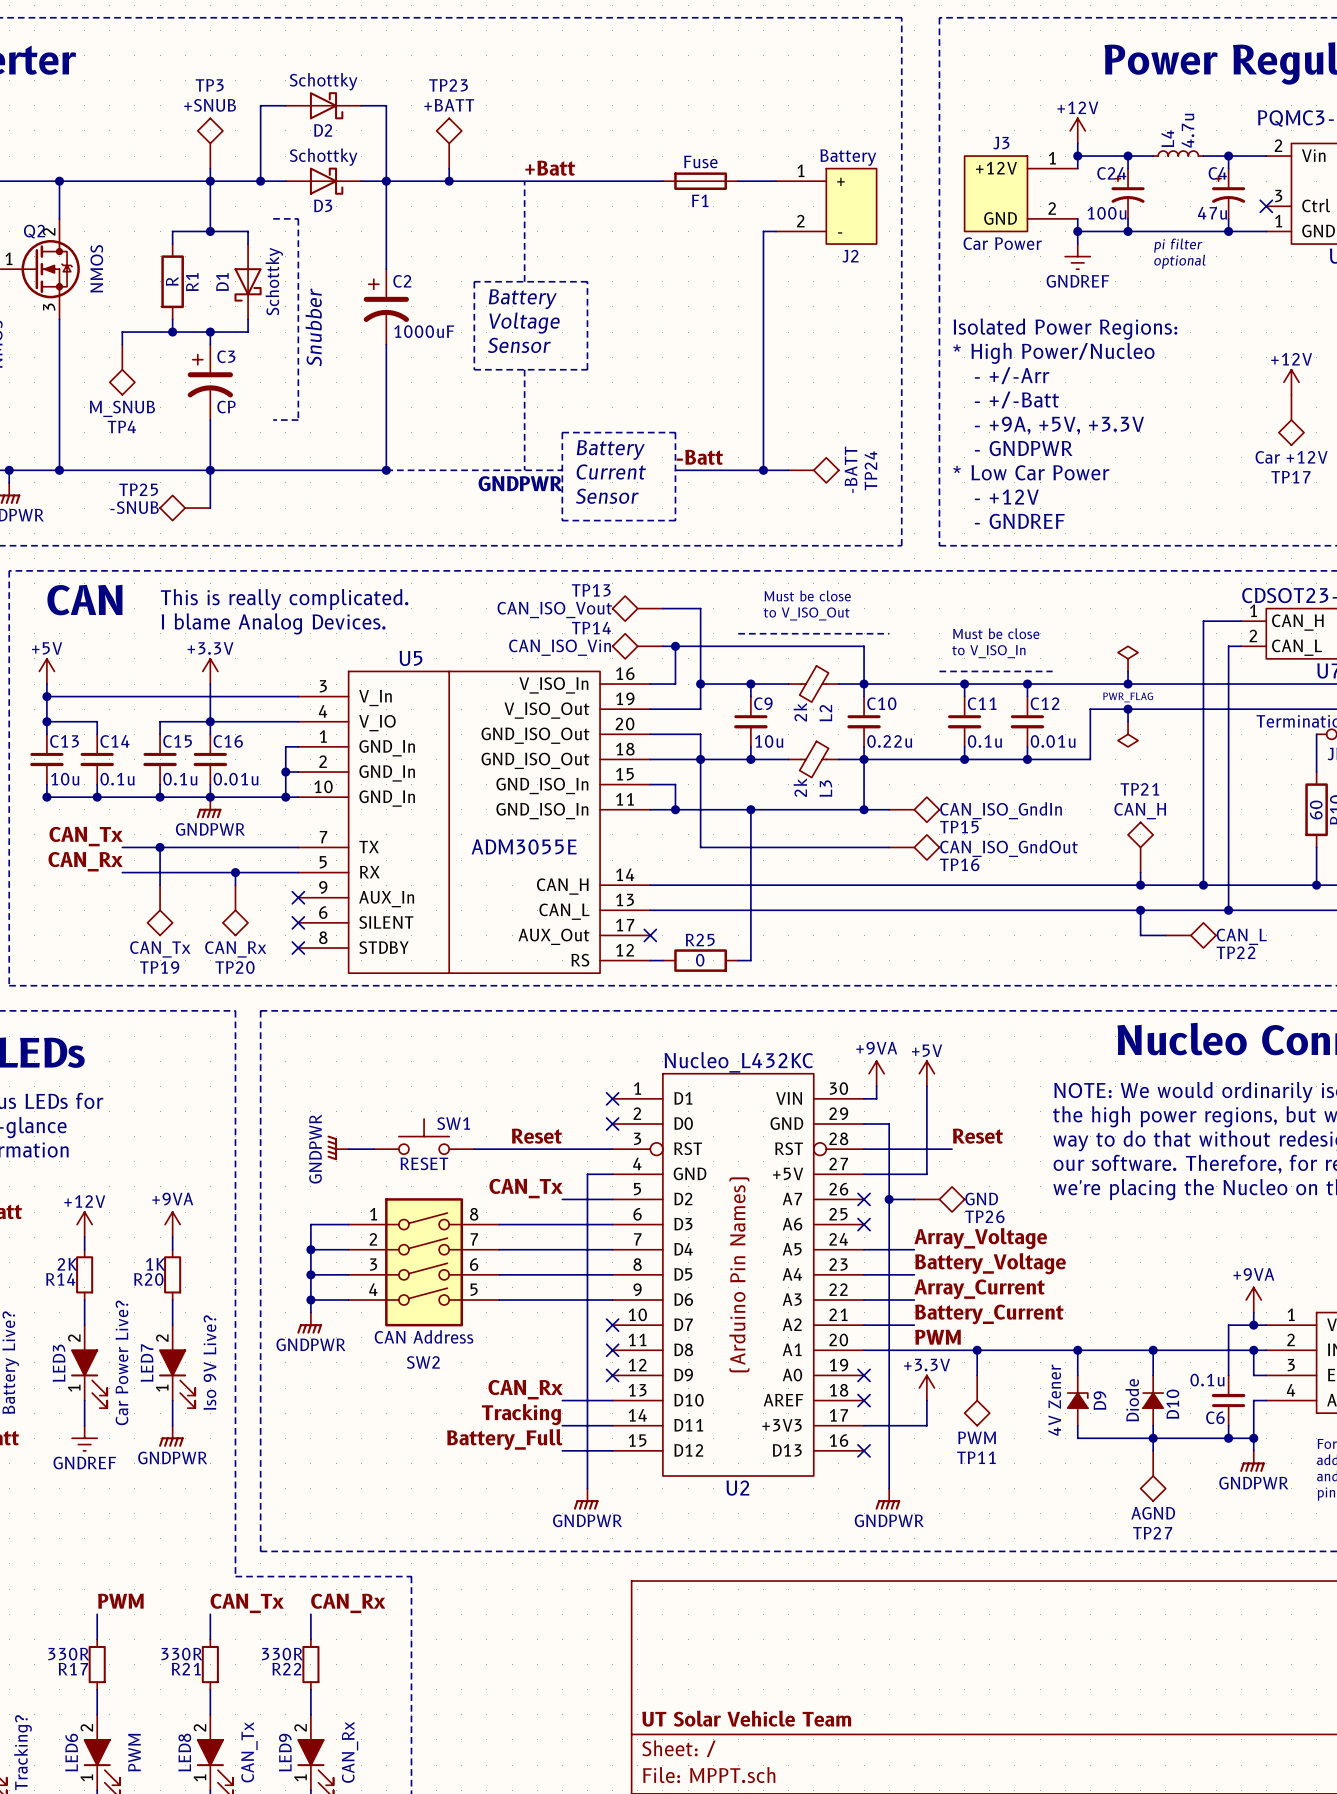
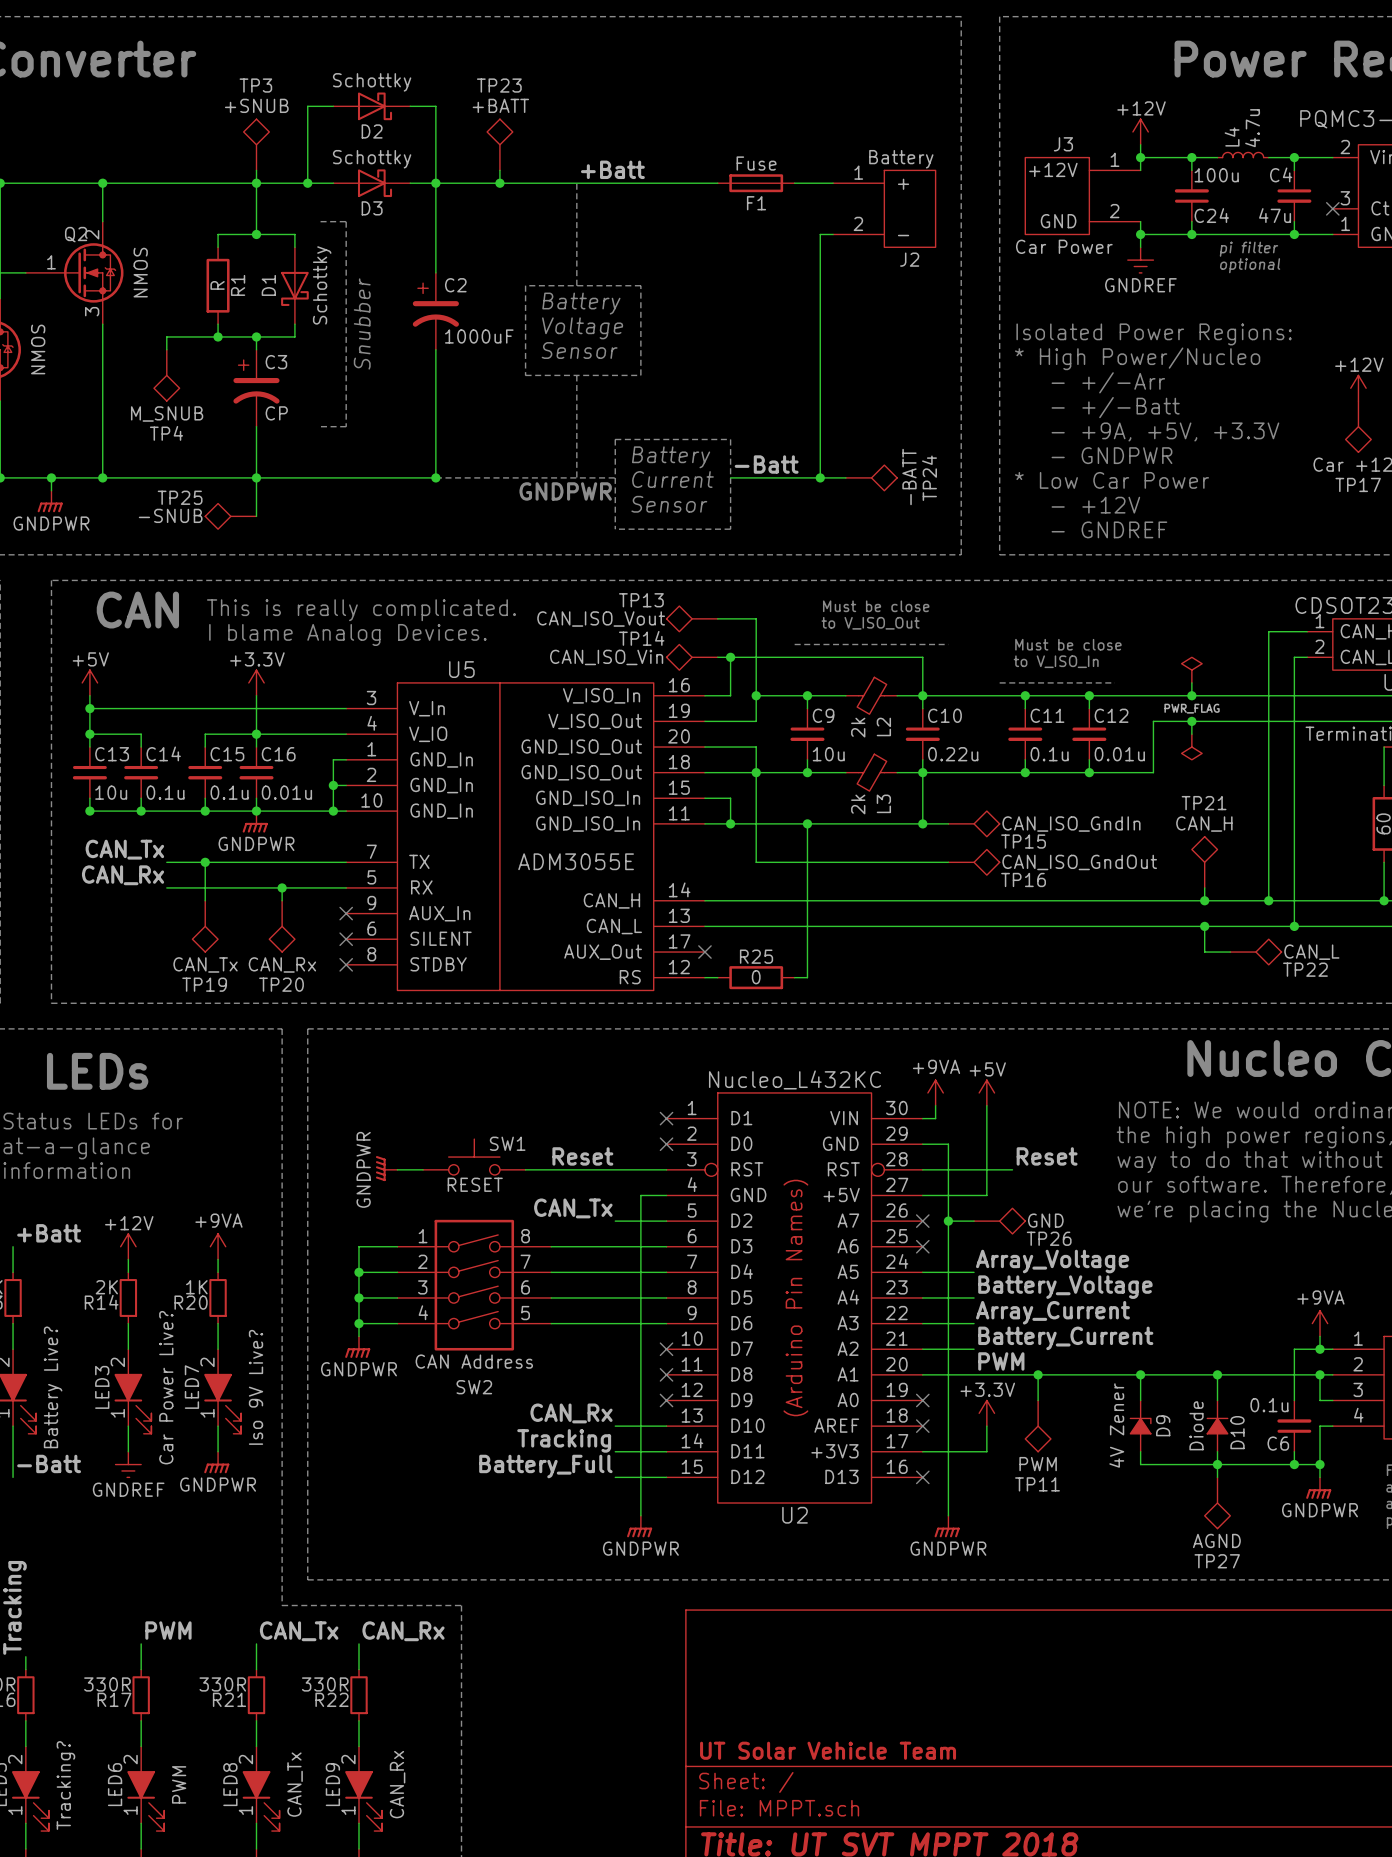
C24 symbol: [1111, 168, 1145, 219] -> [1174, 170, 1209, 222]
C4 symbol: [1212, 168, 1246, 219] -> [1277, 170, 1312, 222]
C24 name position: C24 (1111, 173) -> C24 (1211, 215)
C24 value position: 100u (1106, 213) -> 100u (1216, 175)

